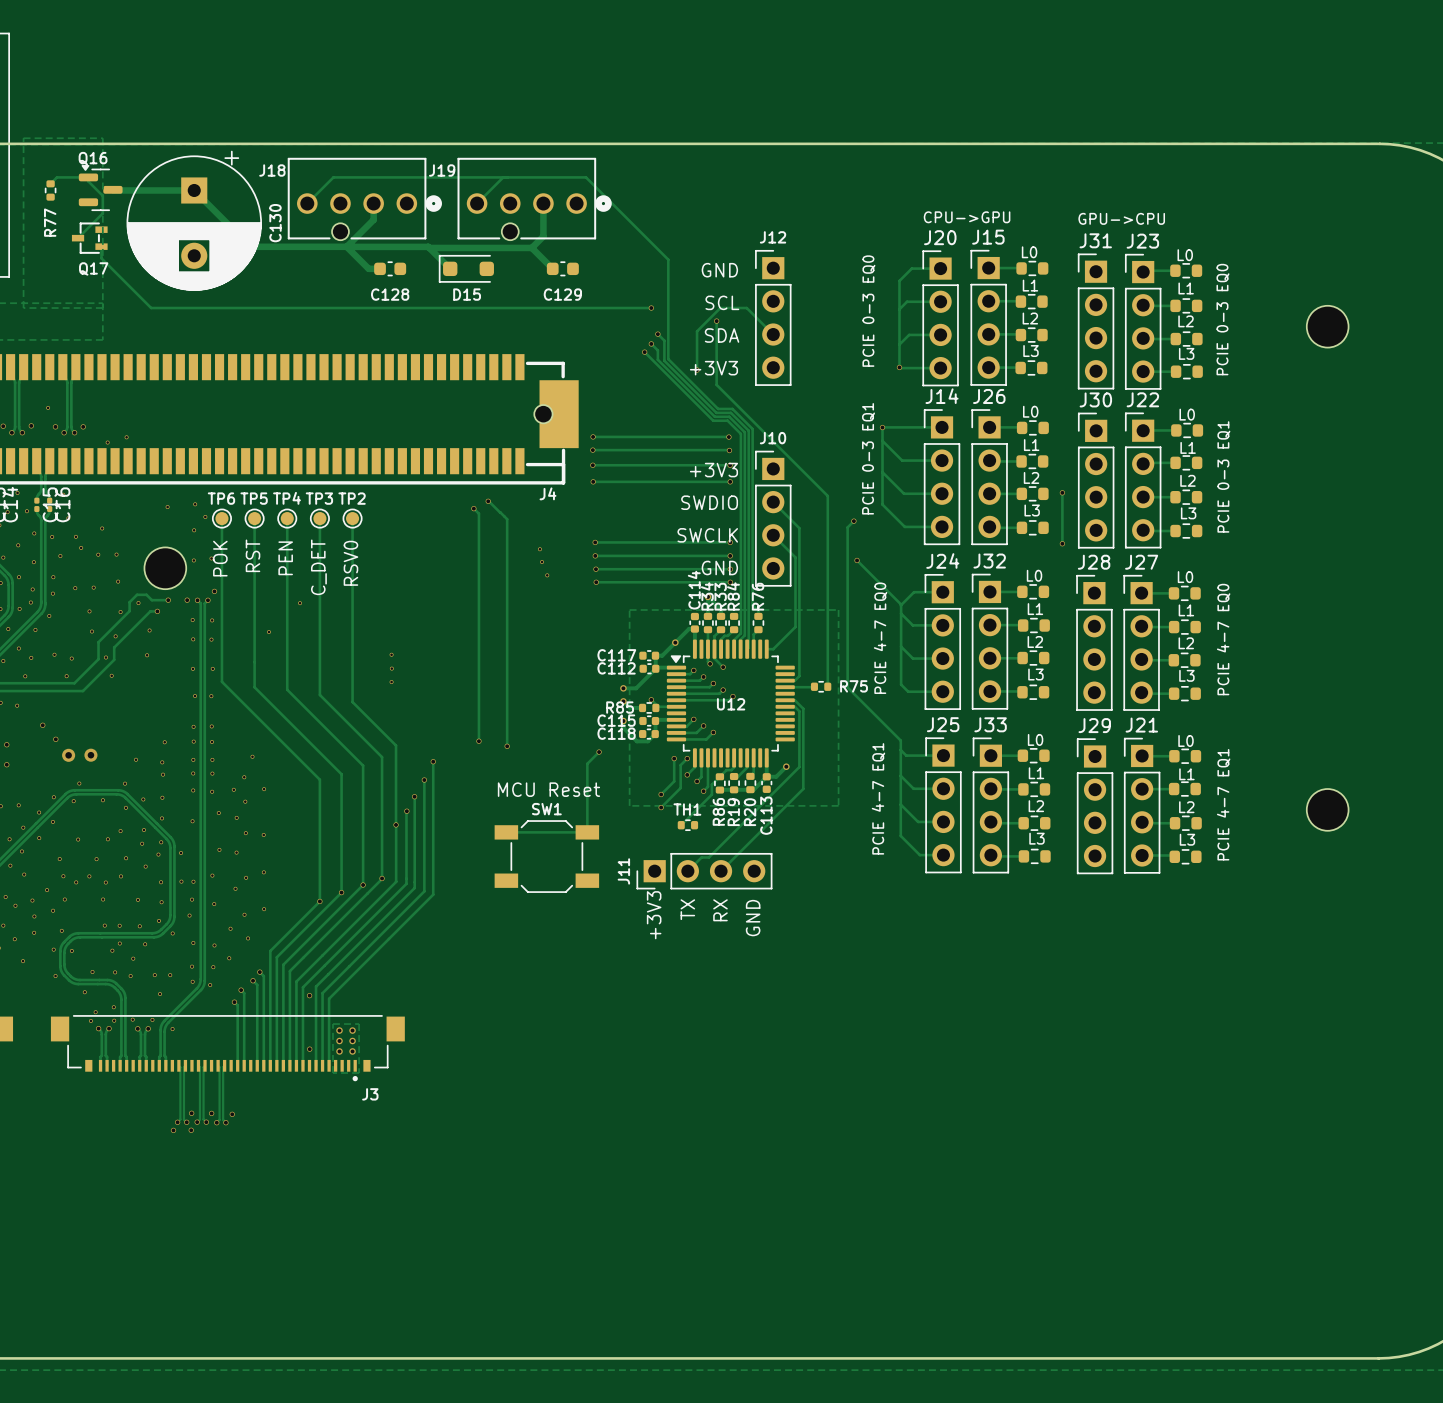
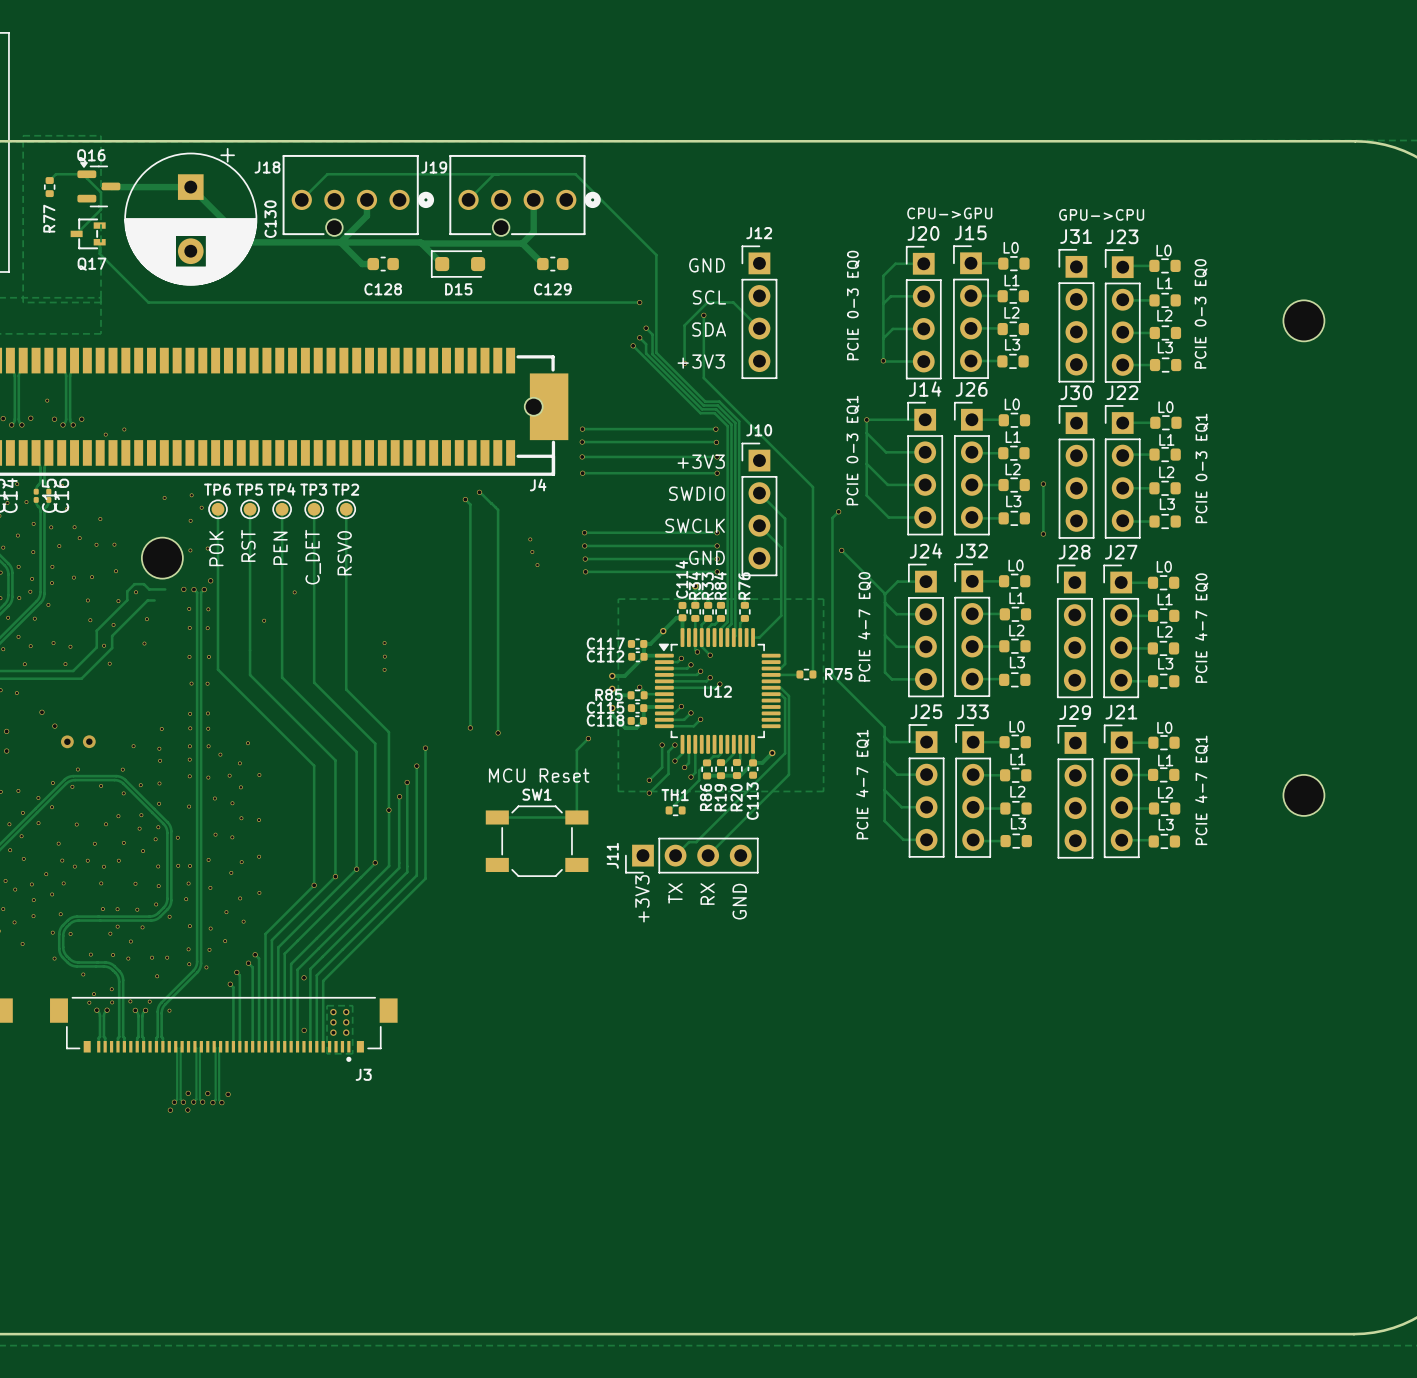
via: (168, 600) -> none
via: (157, 611) -> none
via position: (212, 773) -> (220, 754)

